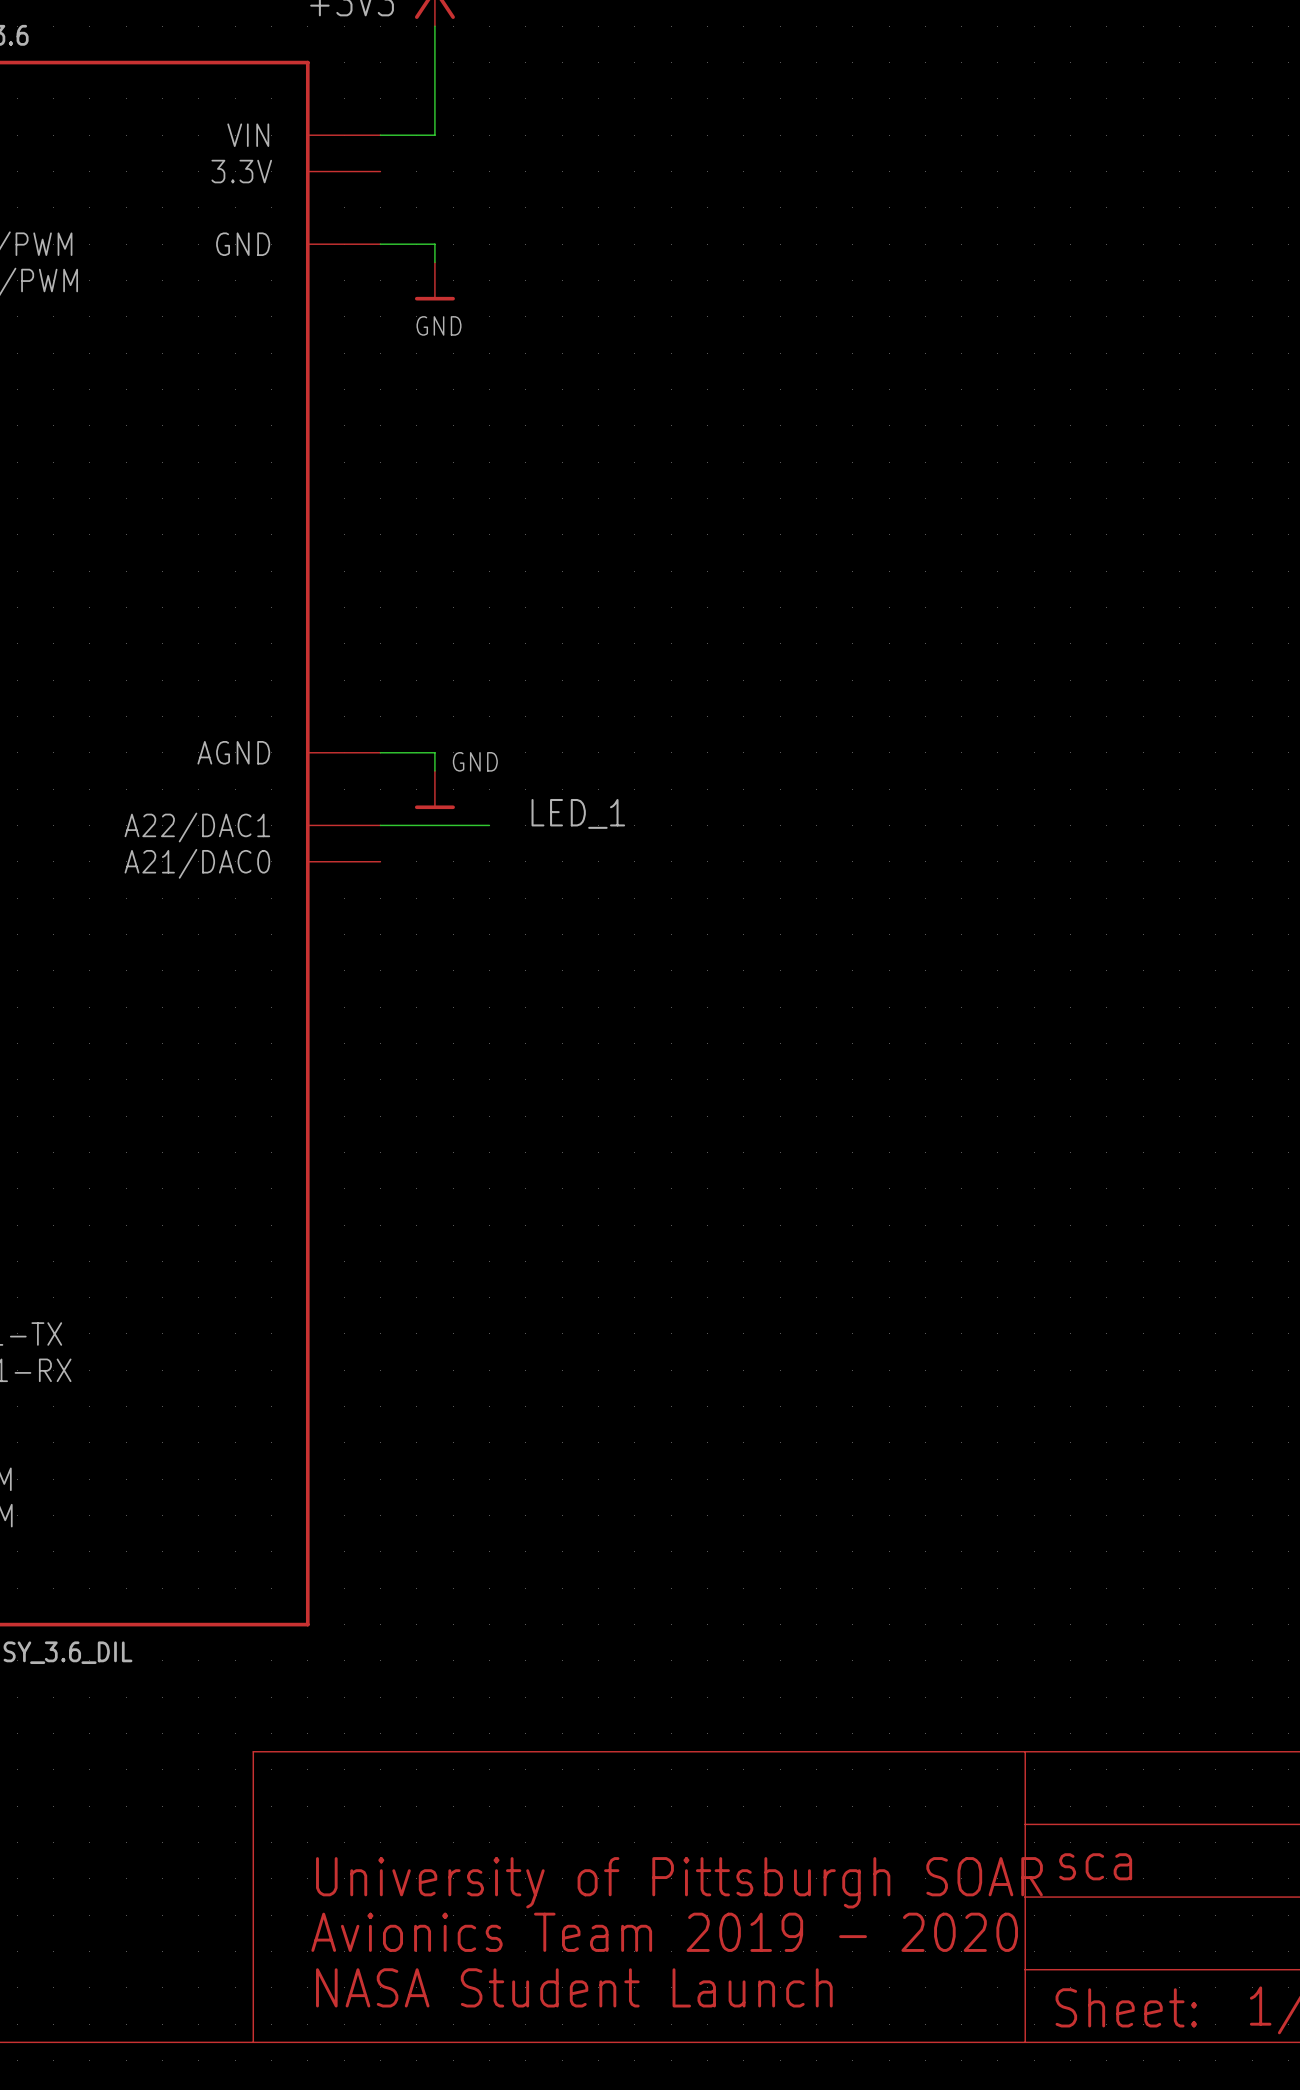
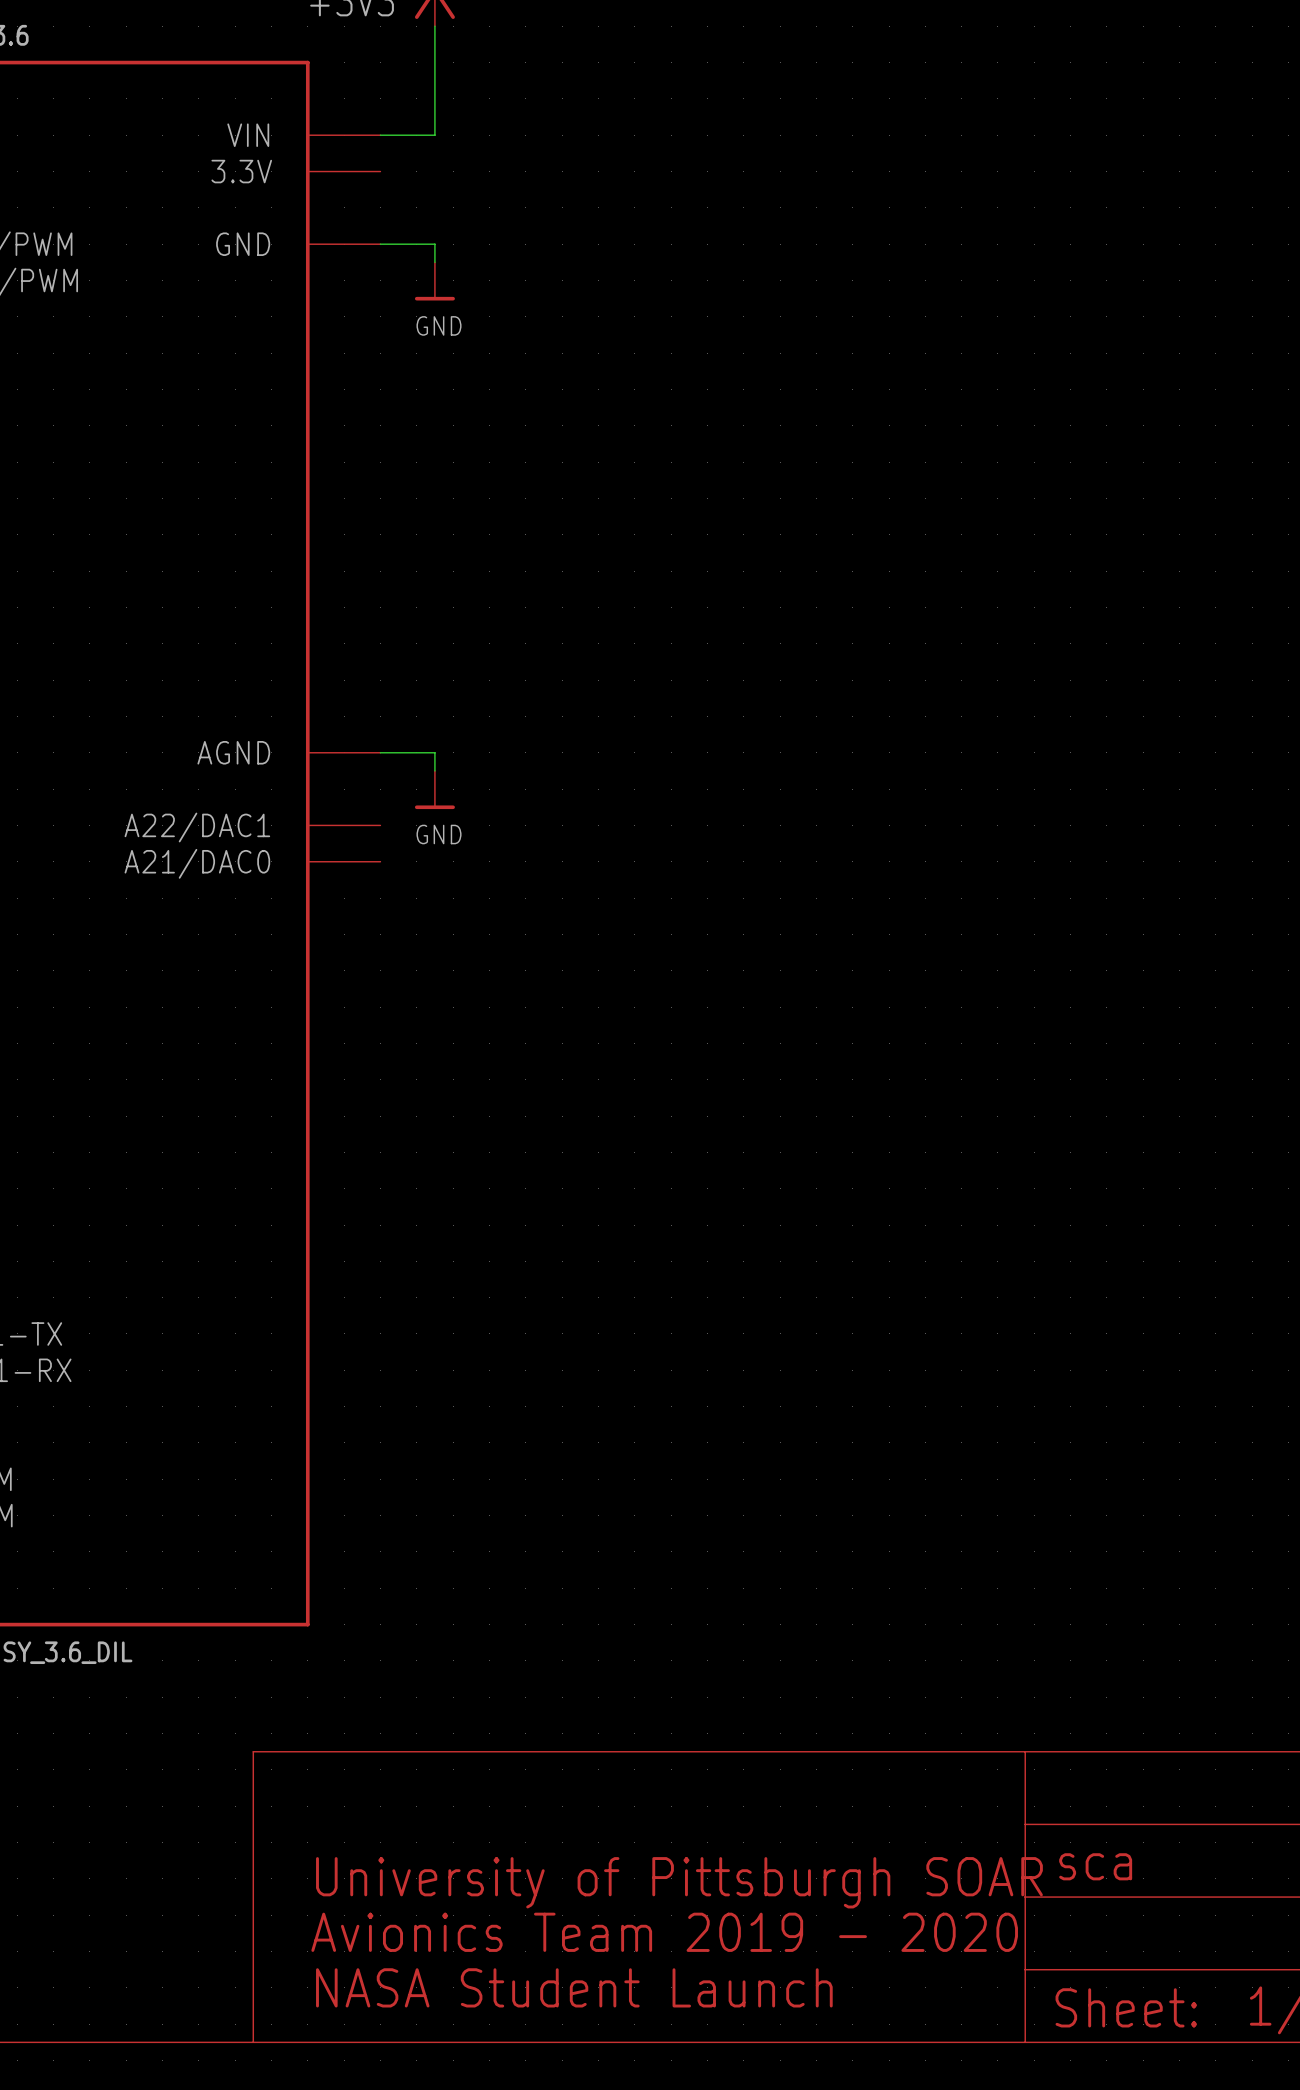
power symbol text position: GND (475, 761) -> GND (439, 834)
label: LED_1 (578, 813) -> none
wire: (380, 825) (489, 825) -> none

